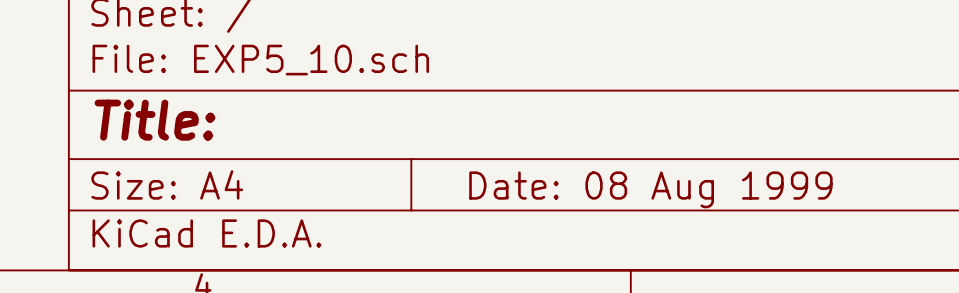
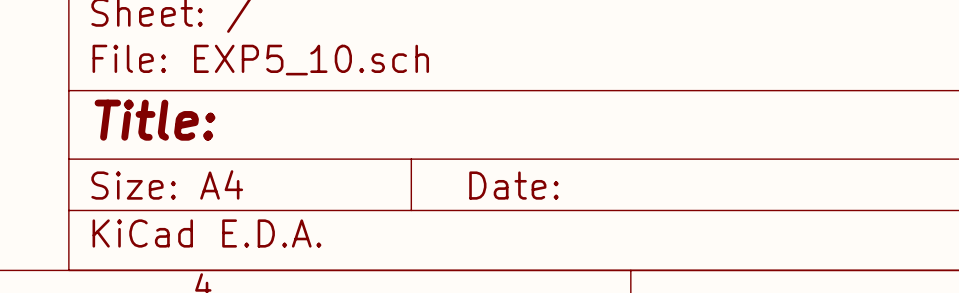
title block: Date: 08 Aug 1999 (650, 189) -> Date: (513, 185)

